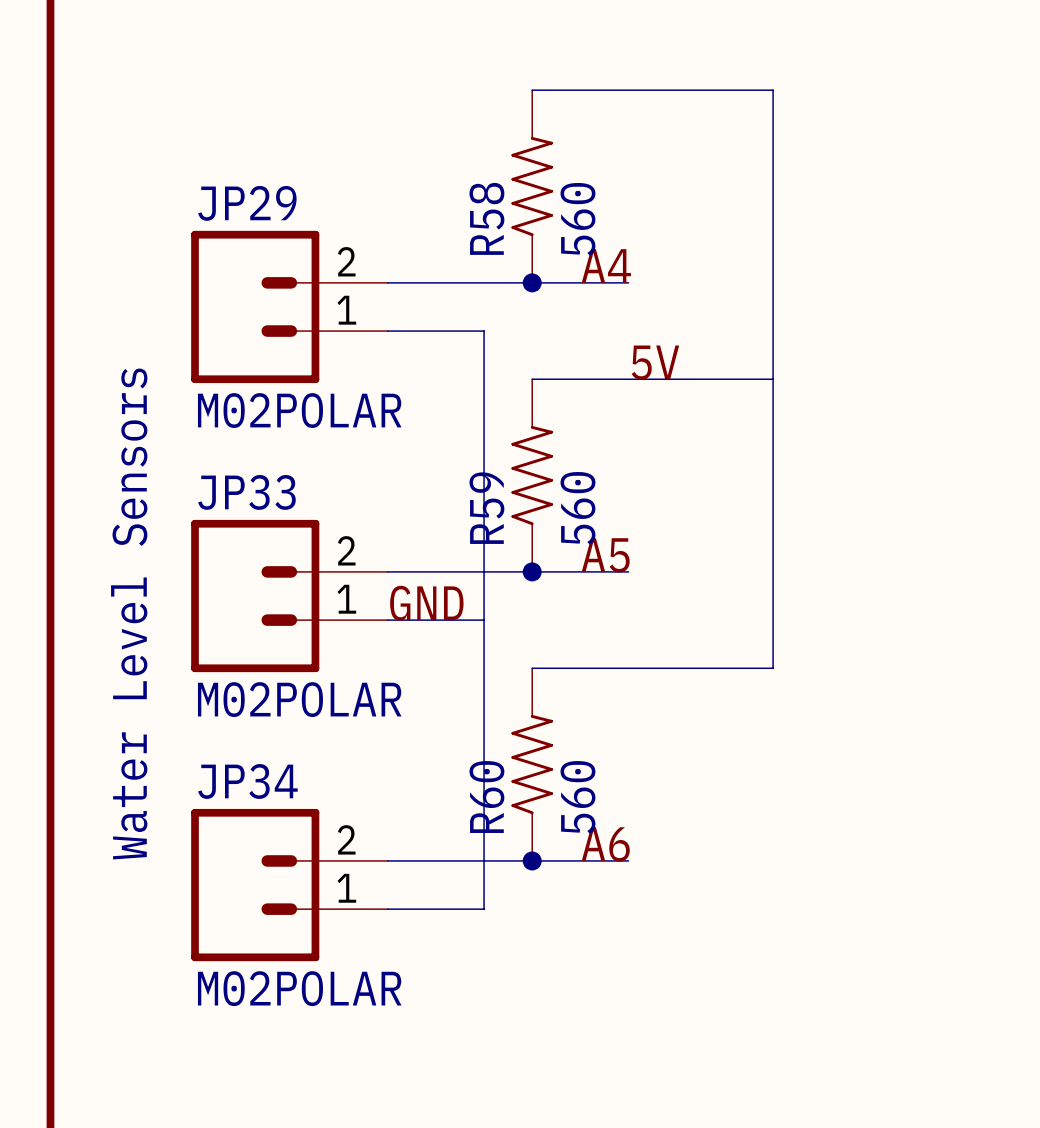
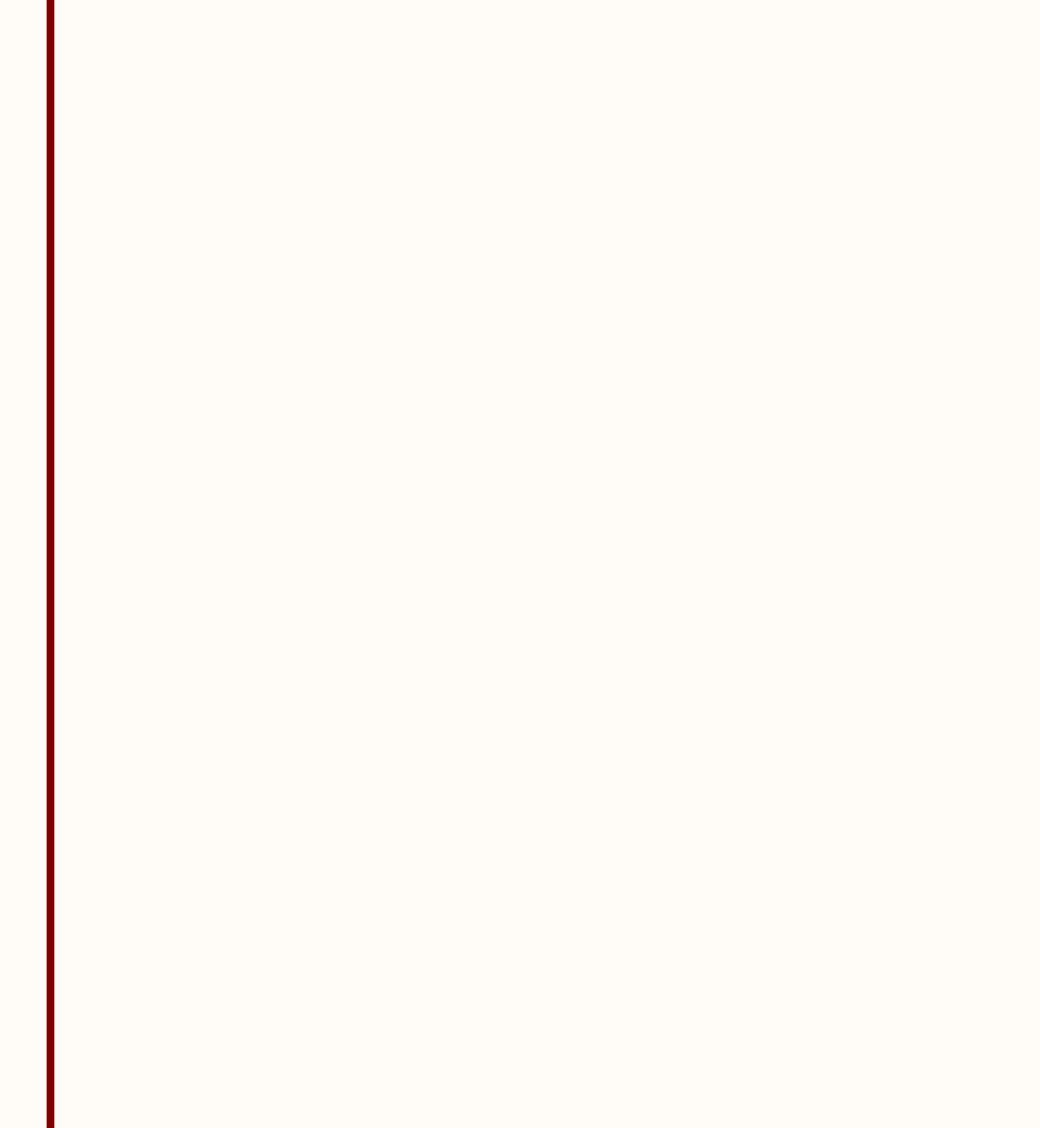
wire: (532, 90) (773, 90) (773, 668) (532, 668) -> none
R58: 560 (532, 186) -> none
label: A4 (606, 266) -> none
wire: (387, 282) (628, 282) -> none
junction: (532, 282) -> none
JP29: M02POLAR (289, 306) -> none
wire: (387, 331) (484, 331) (484, 909) (387, 909) -> none
label: 5V (655, 362) -> none
wire: (532, 379) (773, 379) -> none
R59: 560 (532, 475) -> none
label: A5 (605, 555) -> none
wire: (387, 571) (628, 571) -> none
junction: (532, 571) -> none
JP33: M02POLAR (289, 596) -> none
label: GND (426, 603) -> none
text: Water Level Sensors (129, 614) -> none
wire: (387, 620) (484, 620) -> none
R60: 560 (532, 764) -> none
label: A6 (605, 844) -> none
wire: (387, 860) (628, 860) -> none
junction: (532, 860) -> none
JP34: M02POLAR (289, 885) -> none

